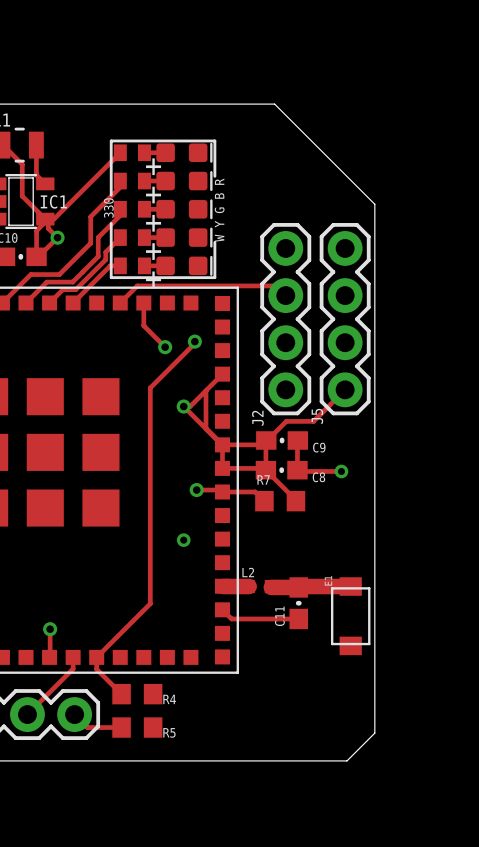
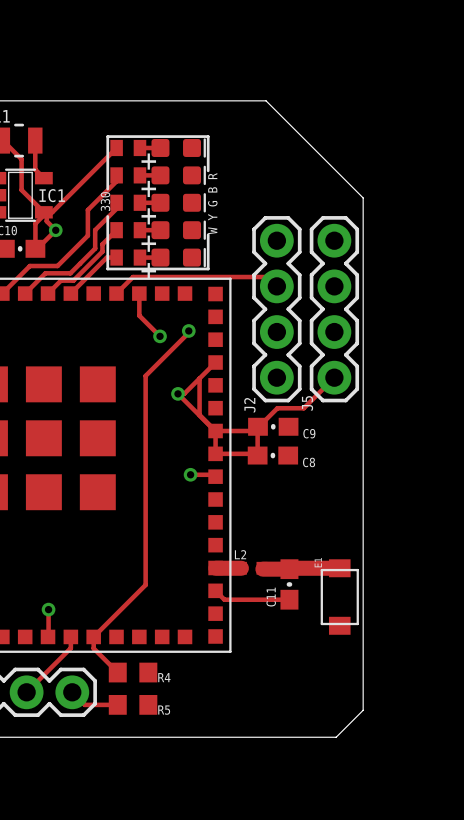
track: (297, 440) (298, 471) (341, 471) -> none
track: (265, 470) (295, 501) -> none
via: (341, 471) -> none
track: (222, 491) (255, 491) (264, 501) -> none
R7: (280, 501) -> none
via: (183, 540) -> none

